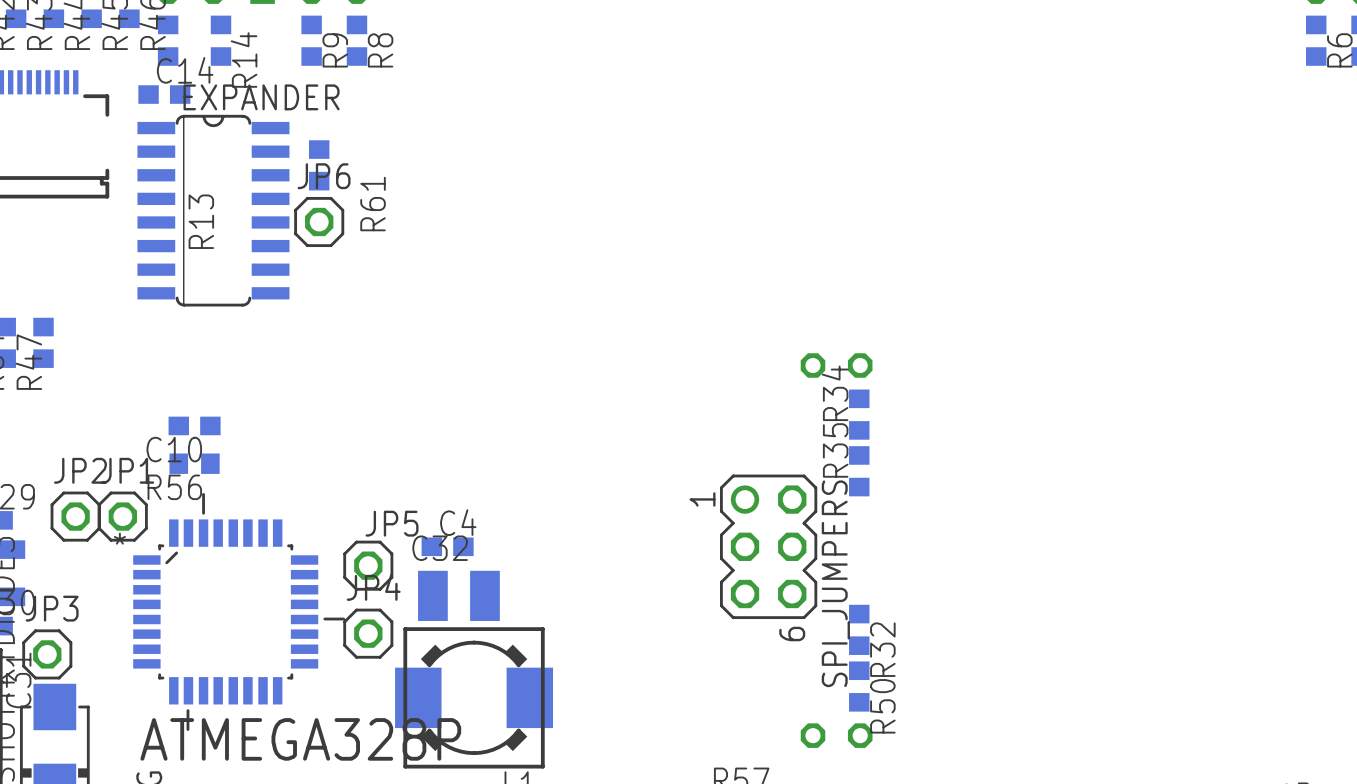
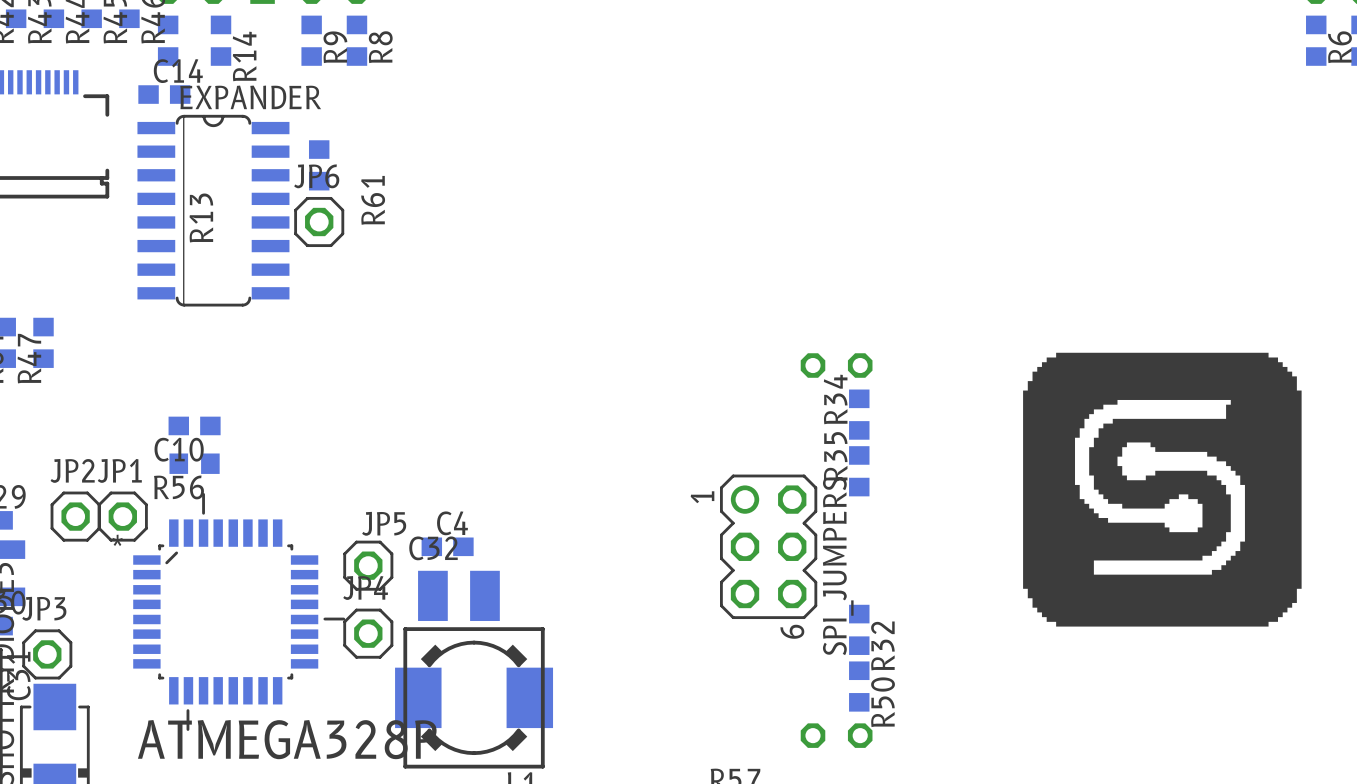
drawing: none -> [1023, 352, 1302, 627]

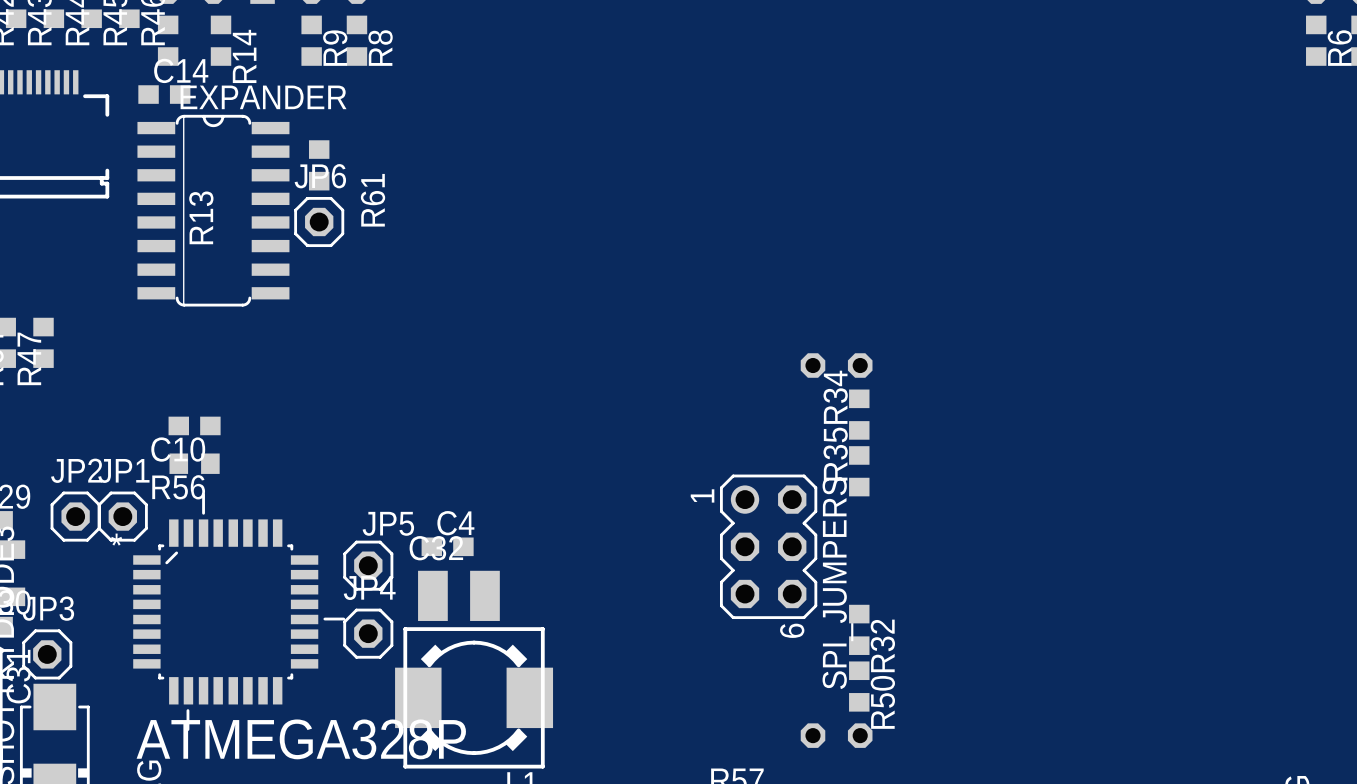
drawing: [1023, 352, 1302, 627] -> none

